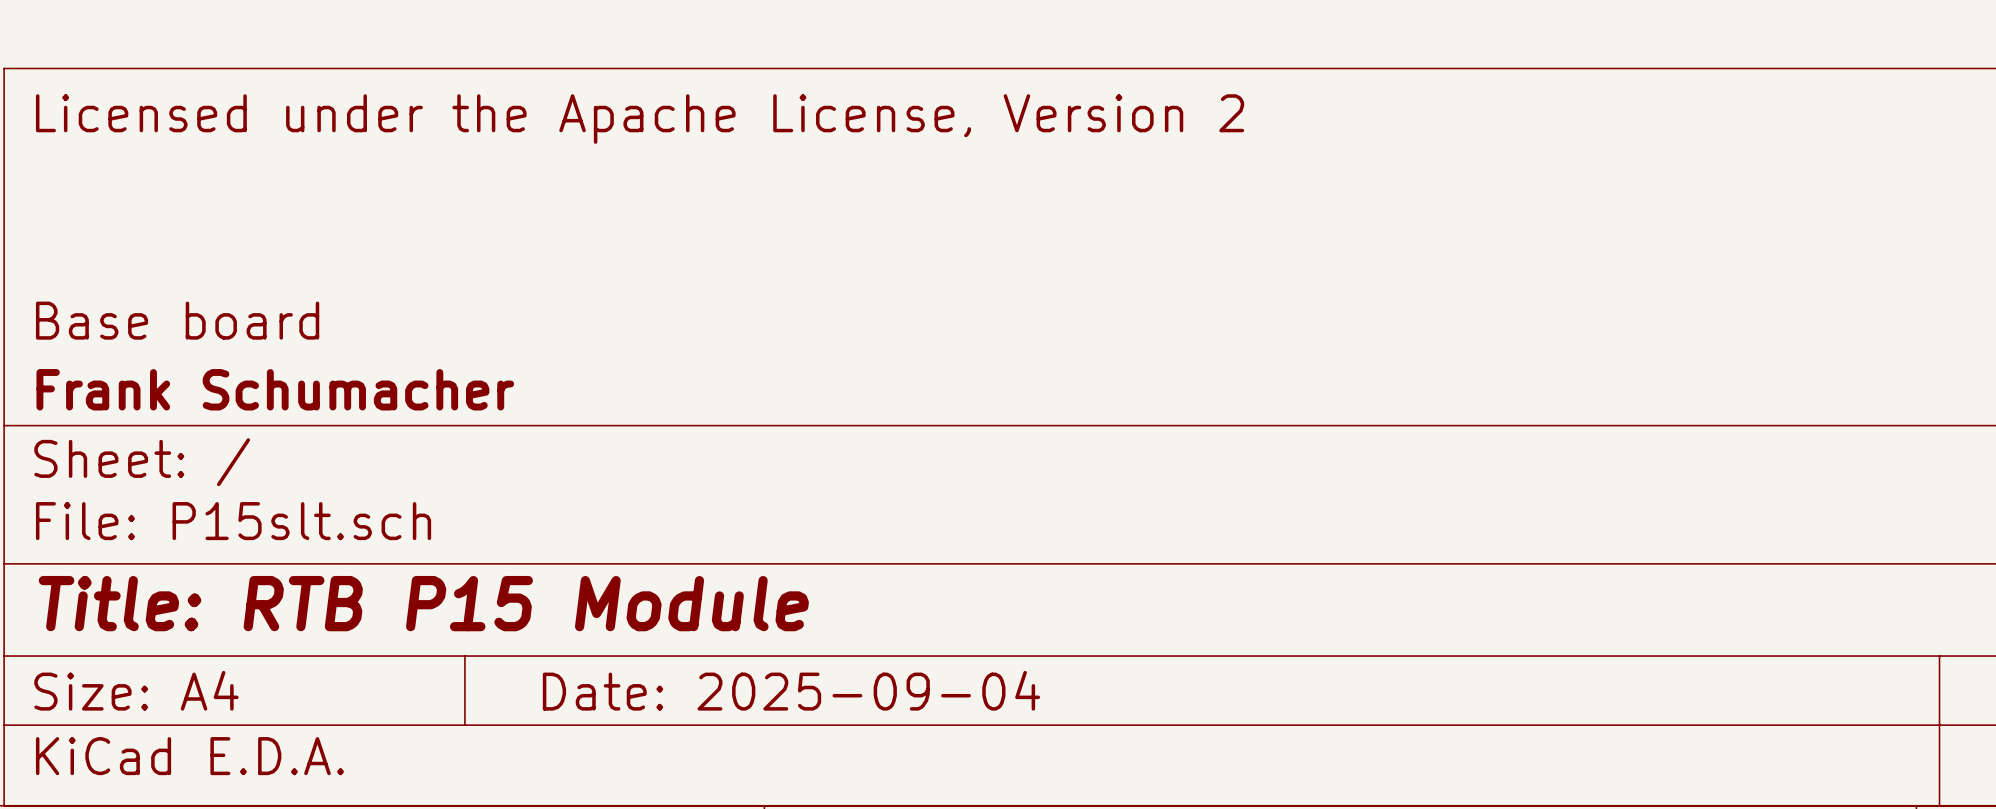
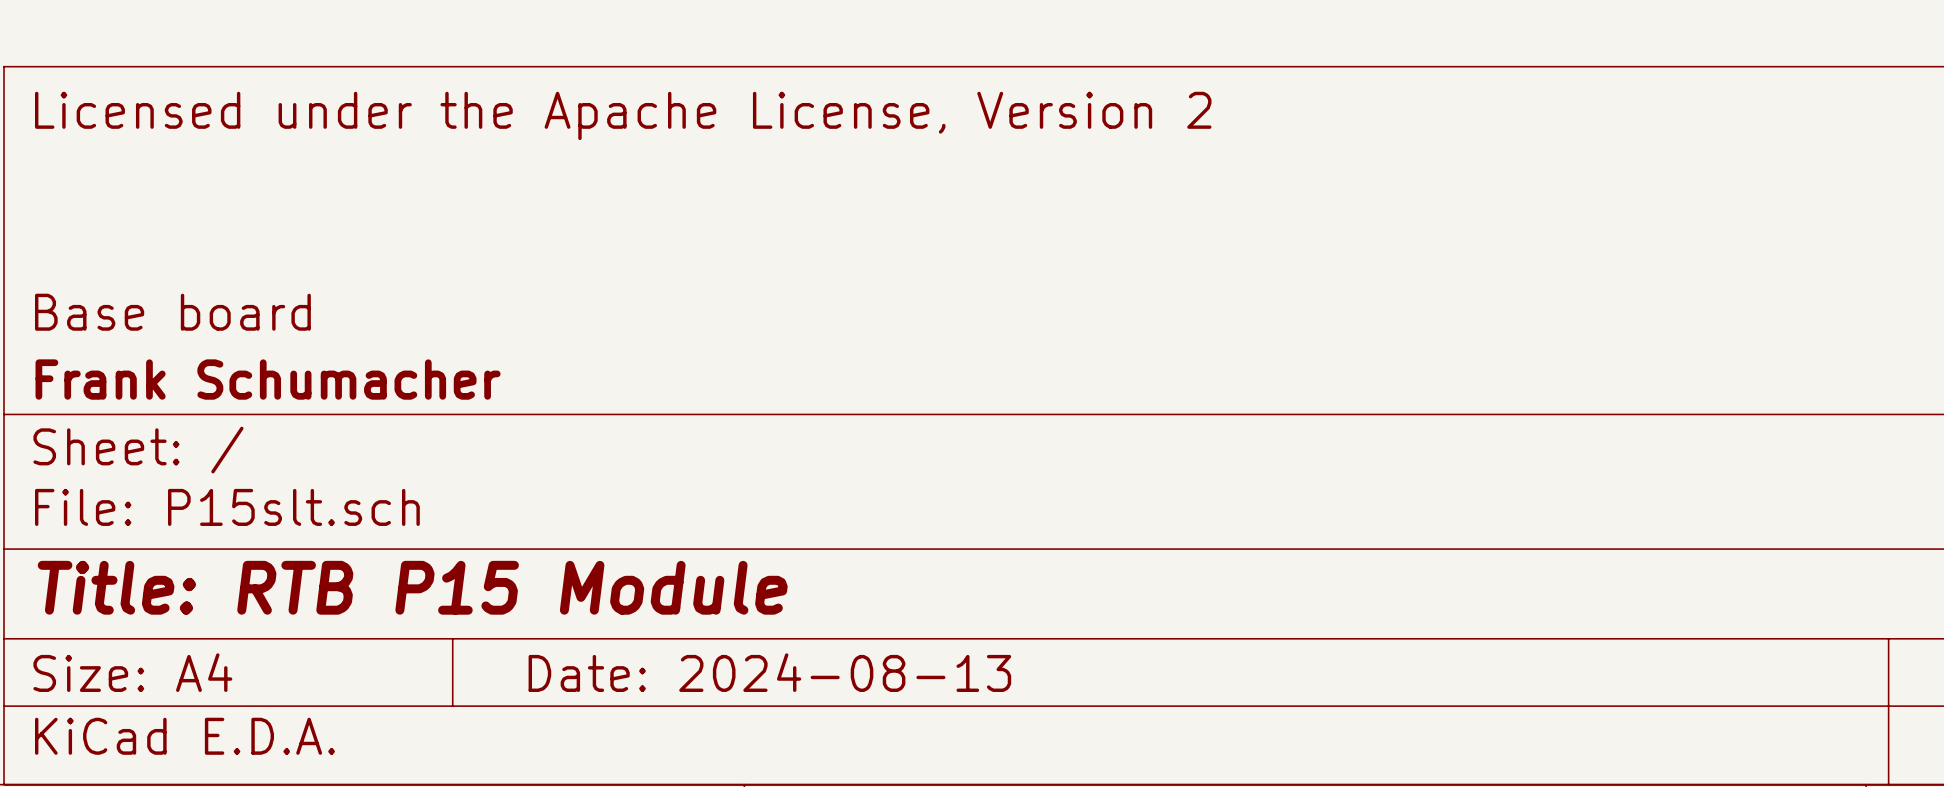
title block: Date: 2025-09-04 (791, 690) -> Date: 2024-08-13 (769, 672)

